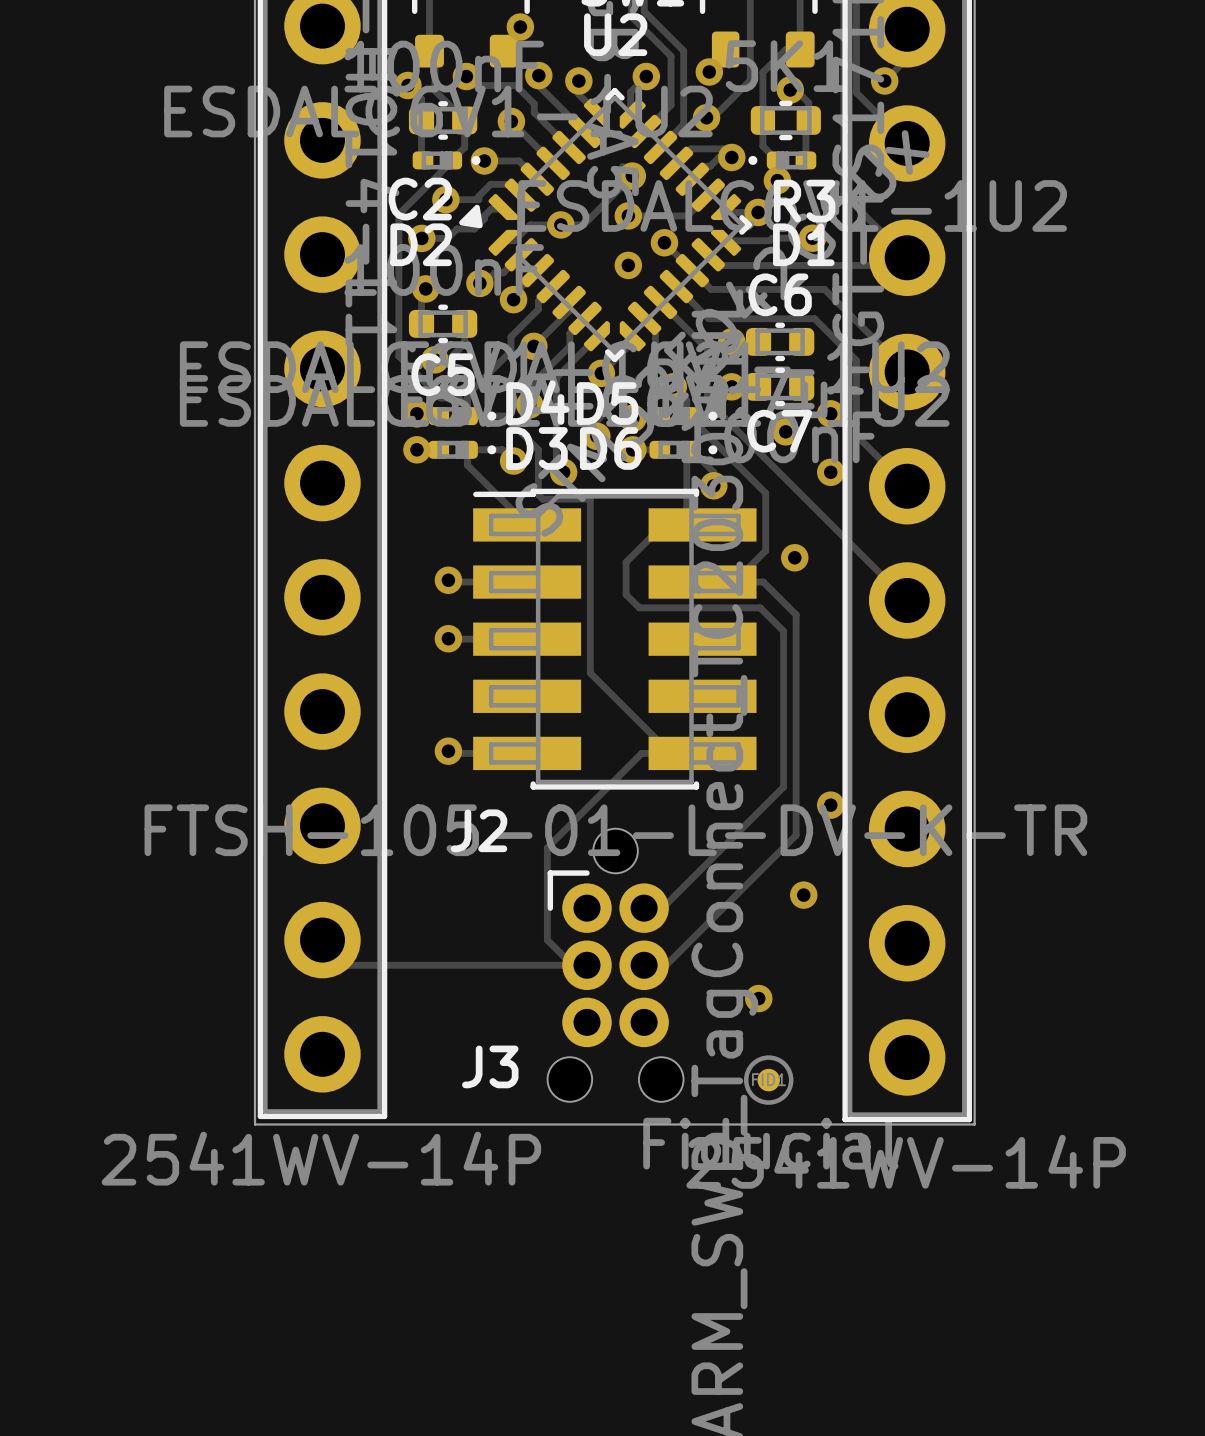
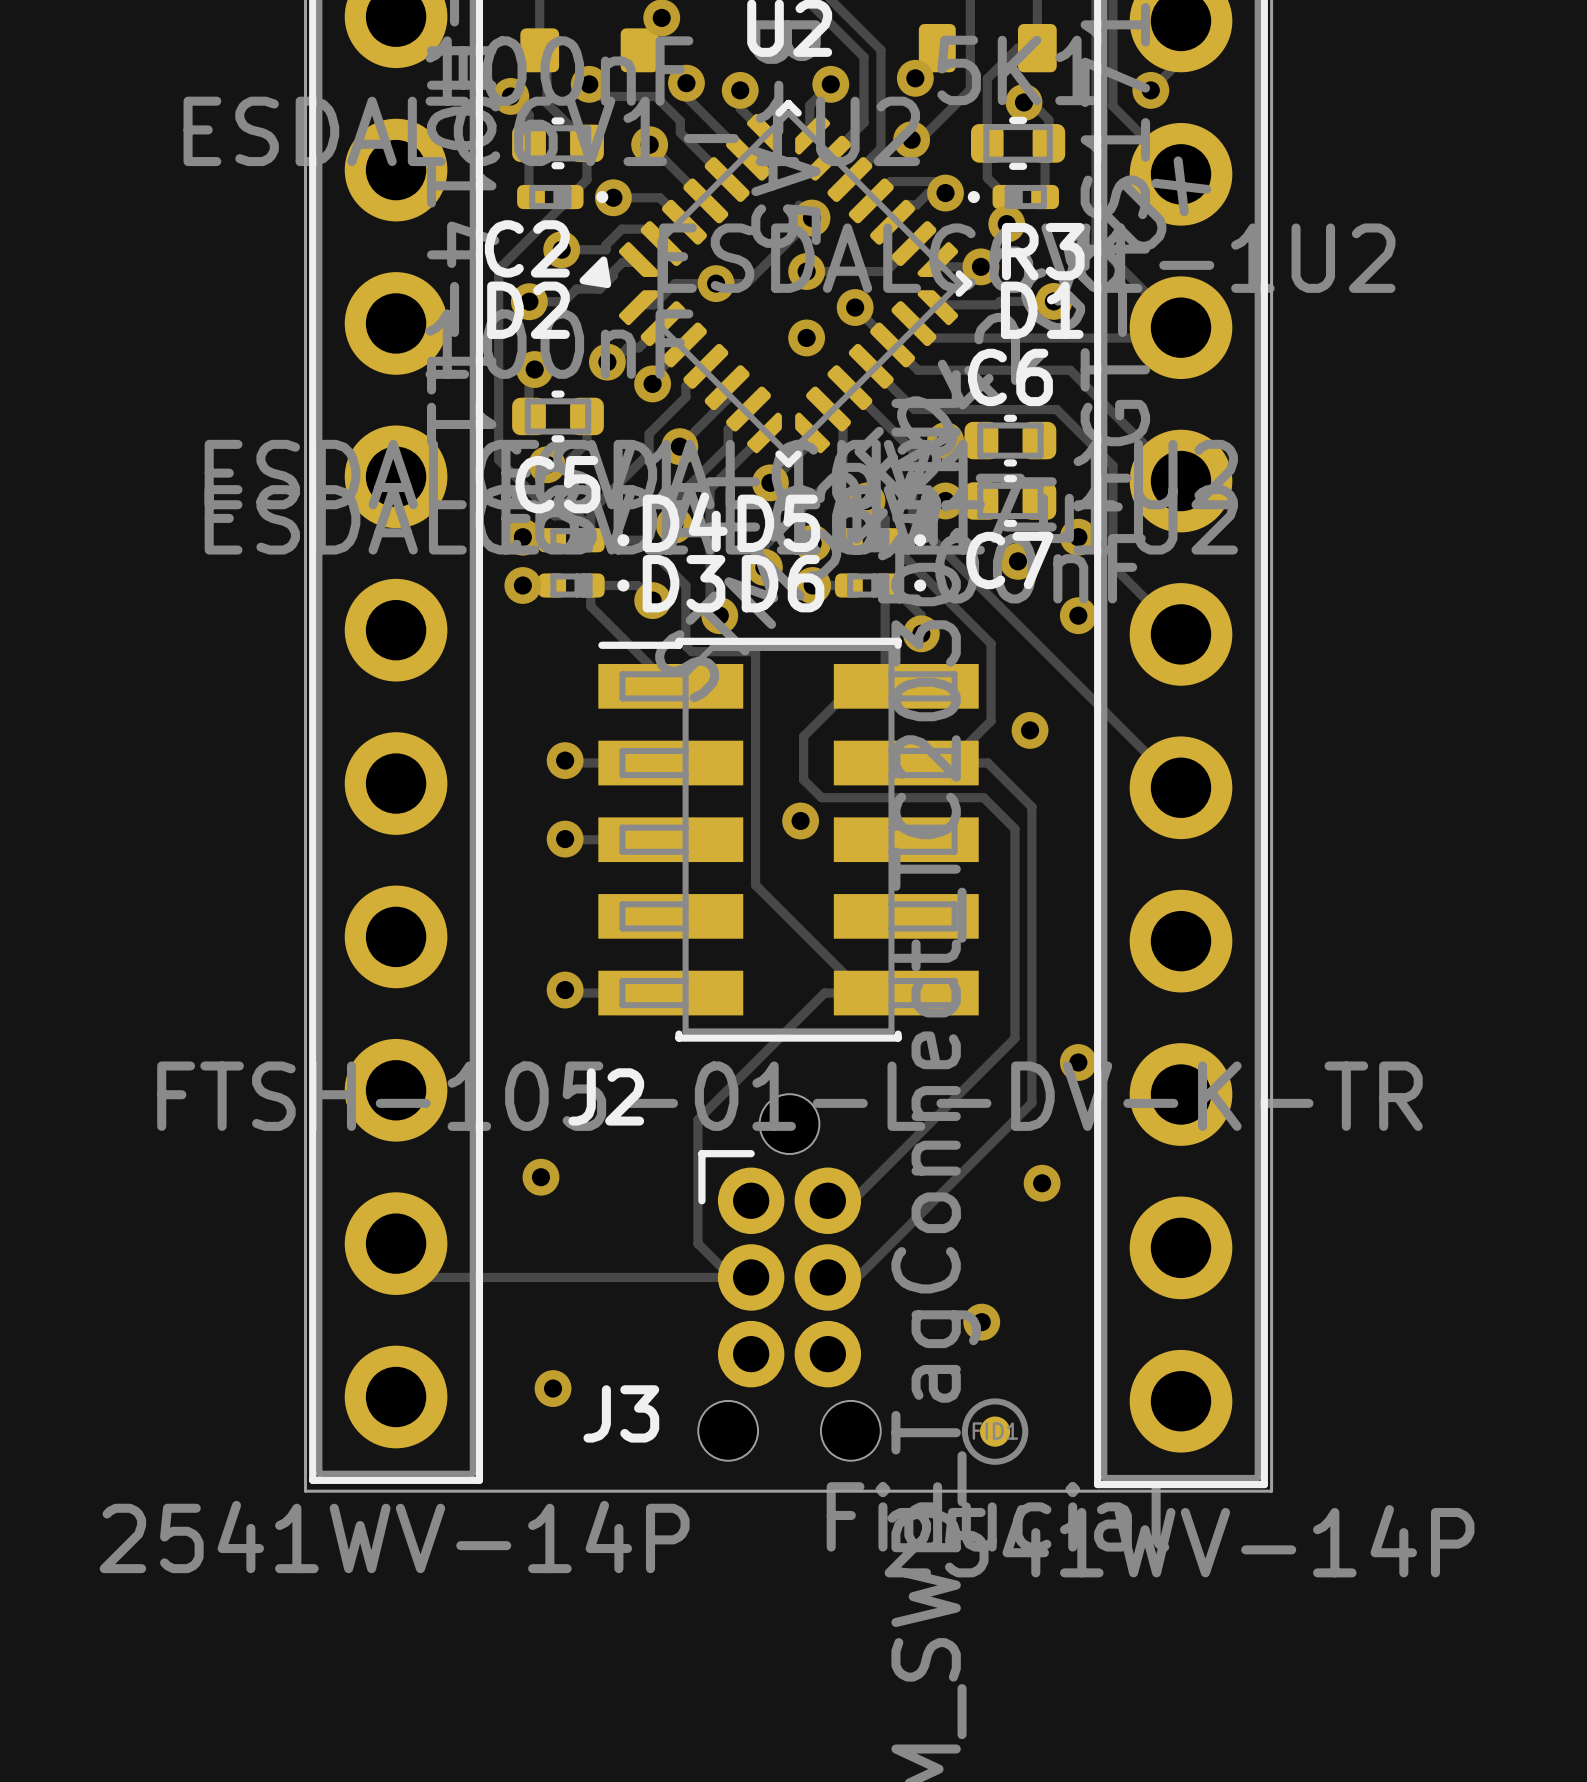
via: none -> (800, 820)
via: none -> (540, 1177)
via: none -> (553, 1388)

